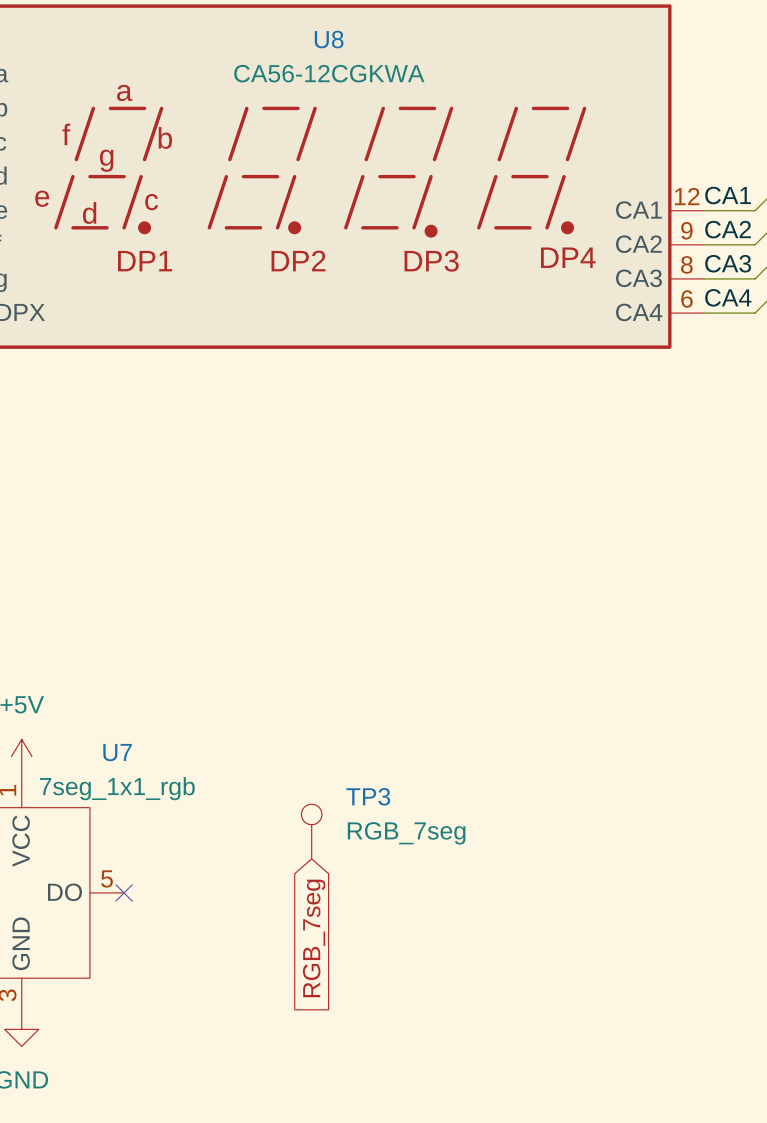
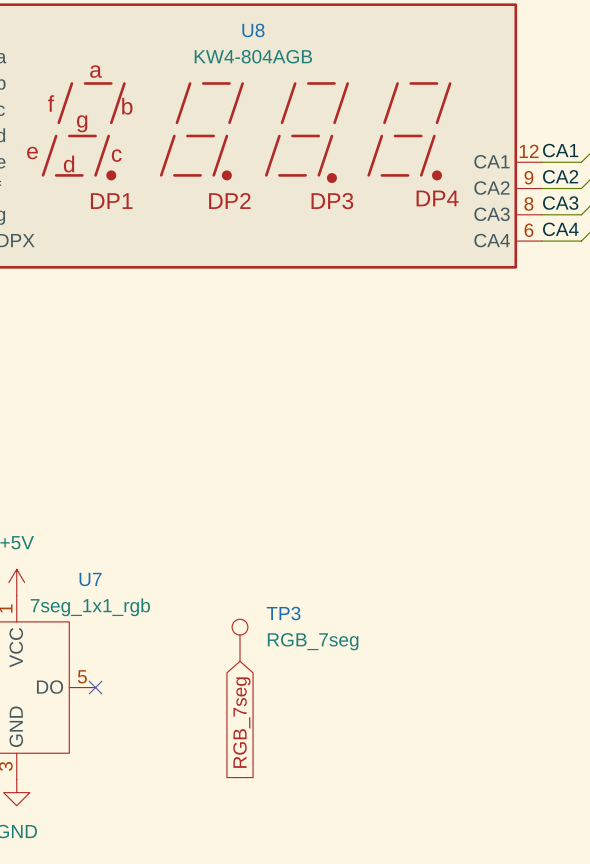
U8 value: CA56-12CGKWA (329, 73) -> KW4-804AGB (253, 56)

